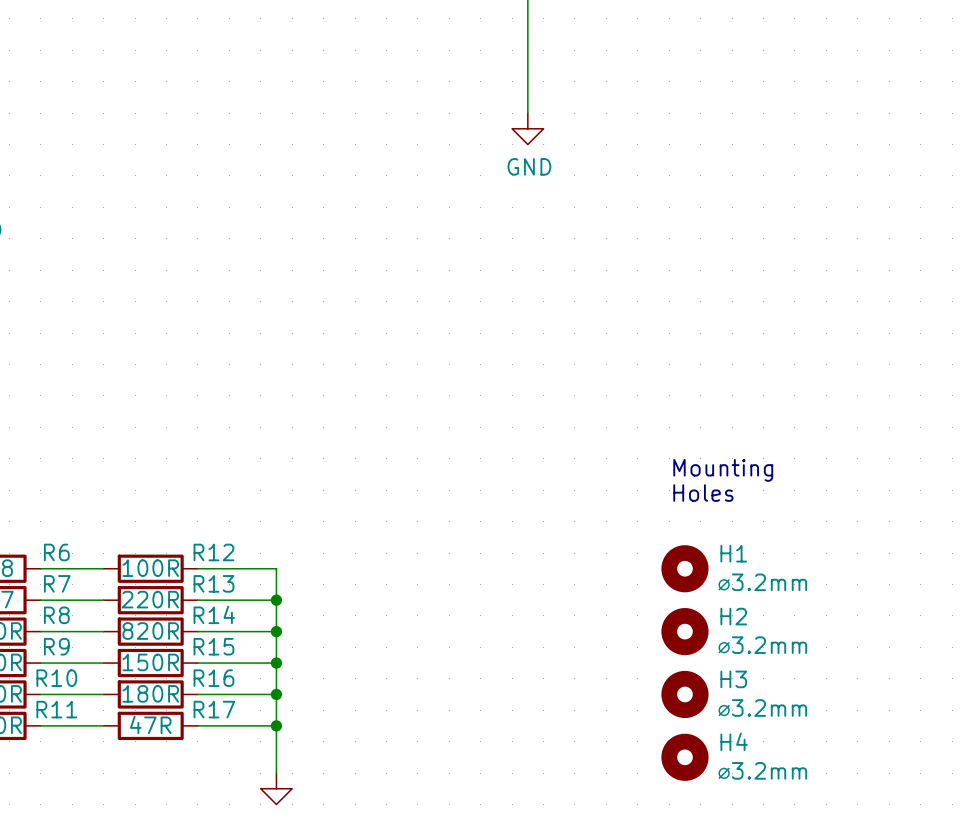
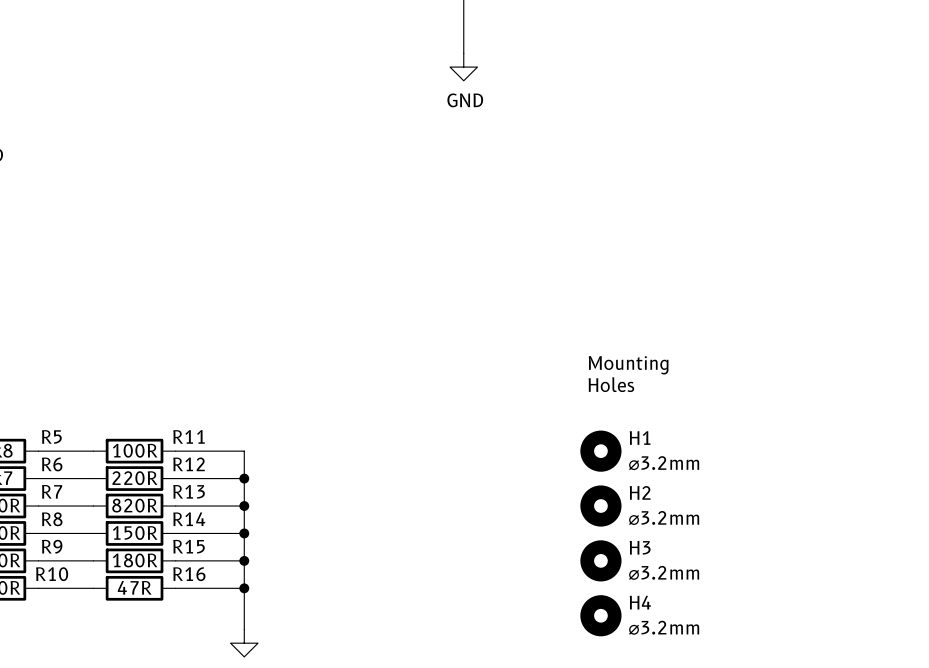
R6 name: R6 (56, 552) -> R5 (51, 436)
R12 name: R12 (213, 552) -> R11 (189, 436)
R7 name: R7 (57, 583) -> R6 (52, 464)
R13 name: R13 (213, 583) -> R12 (189, 464)
R14 name: R14 (214, 614) -> R13 (189, 491)
R8 name: R8 (56, 615) -> R7 (52, 491)
R9 name: R9 (56, 646) -> R8 (52, 519)
R15 name: R15 (213, 646) -> R14 (189, 519)
R10 name: R10 (56, 678) -> R9 (52, 546)
R16 name: R16 (213, 678) -> R15 (188, 546)
R11 name: R11 (56, 709) -> R10 (52, 574)
R17 name: R17 (214, 709) -> R16 (189, 574)

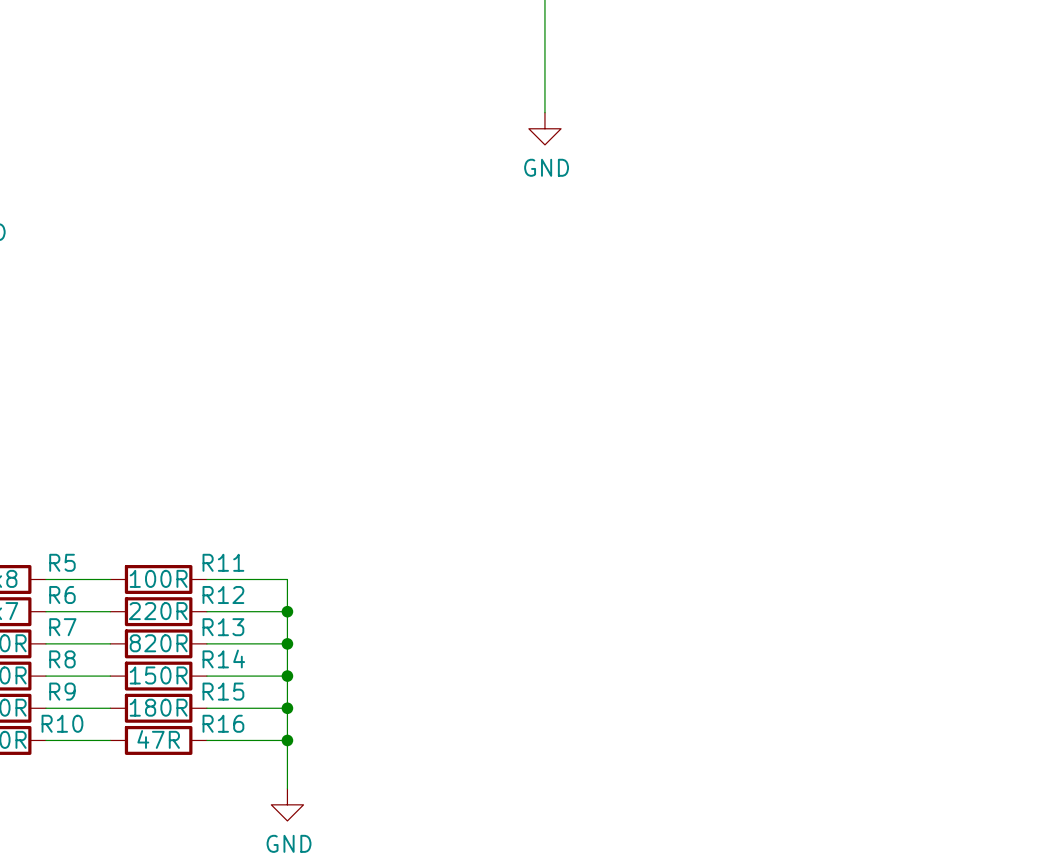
text: Mounting (628, 365) -> none
text: Holes (611, 384) -> none
H1: ⌀3.2mm (600, 451) -> none
H2: ⌀3.2mm (600, 506) -> none
H3: ⌀3.2mm (600, 560) -> none
H4: ⌀3.2mm (600, 615) -> none

